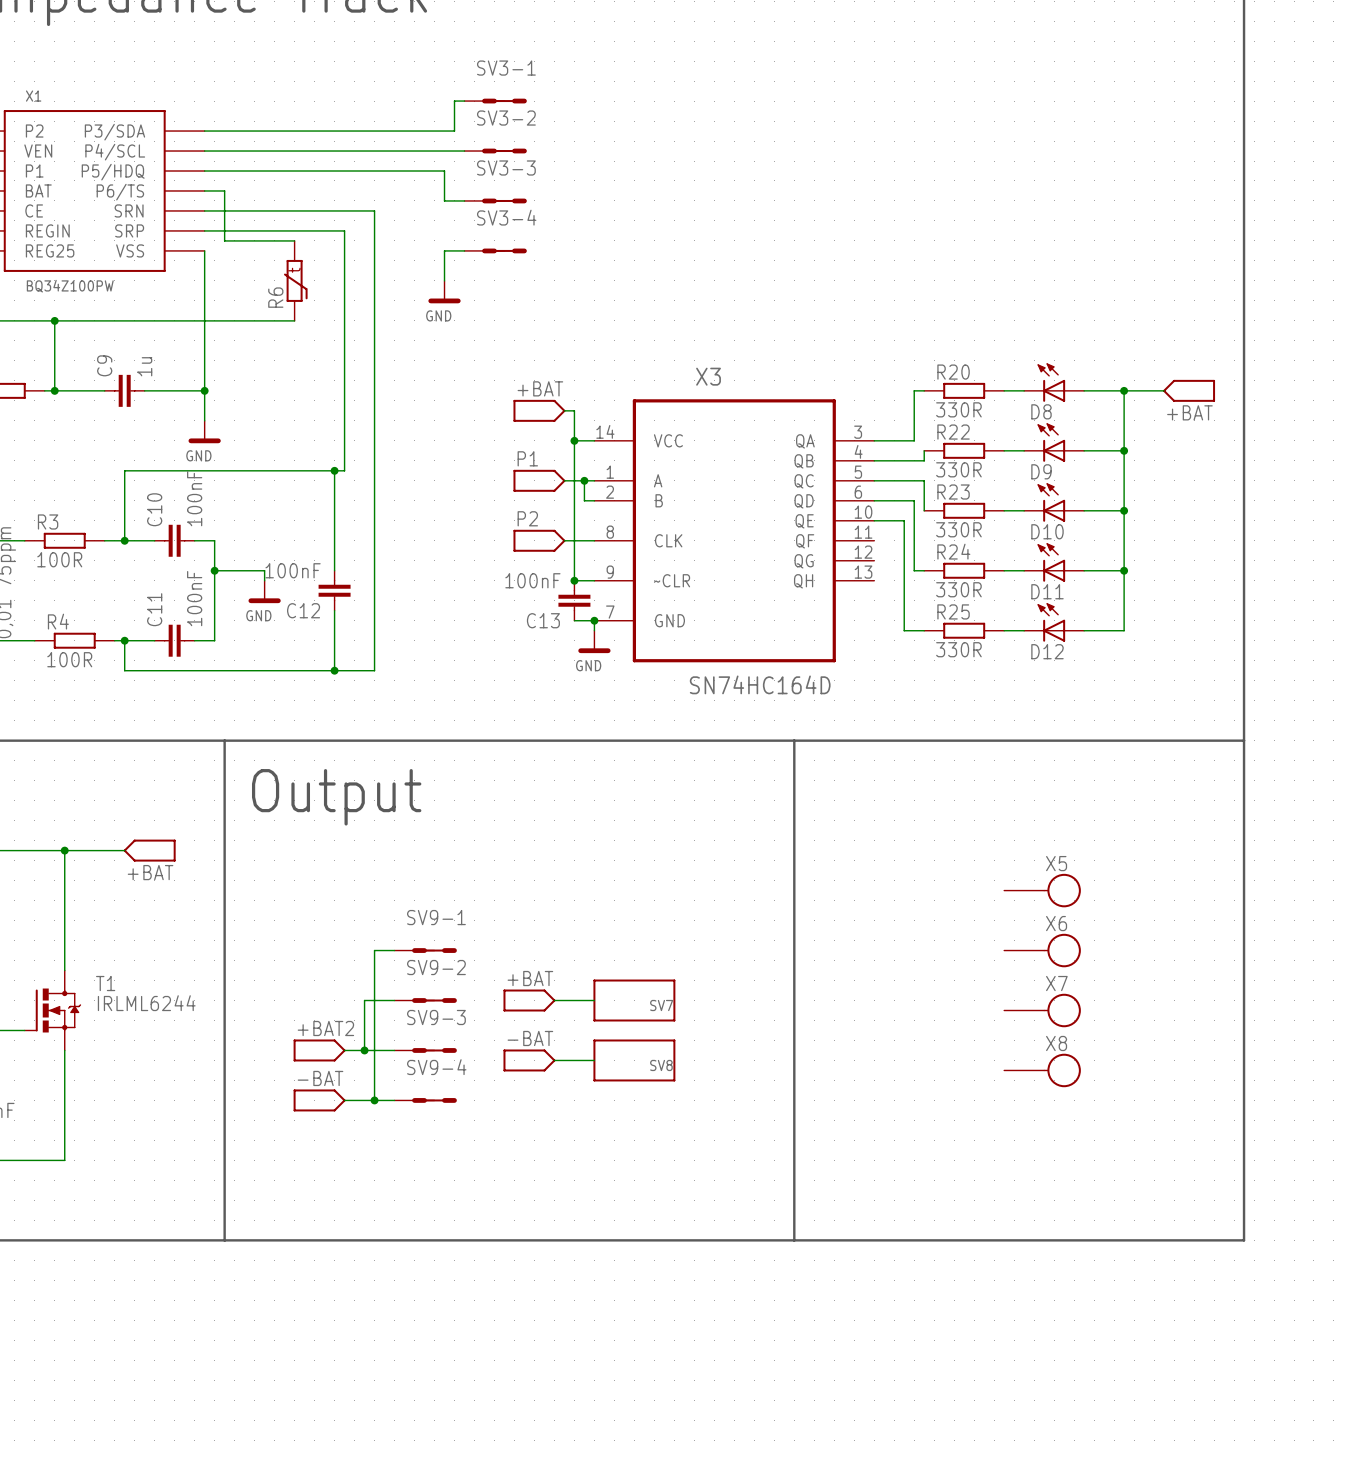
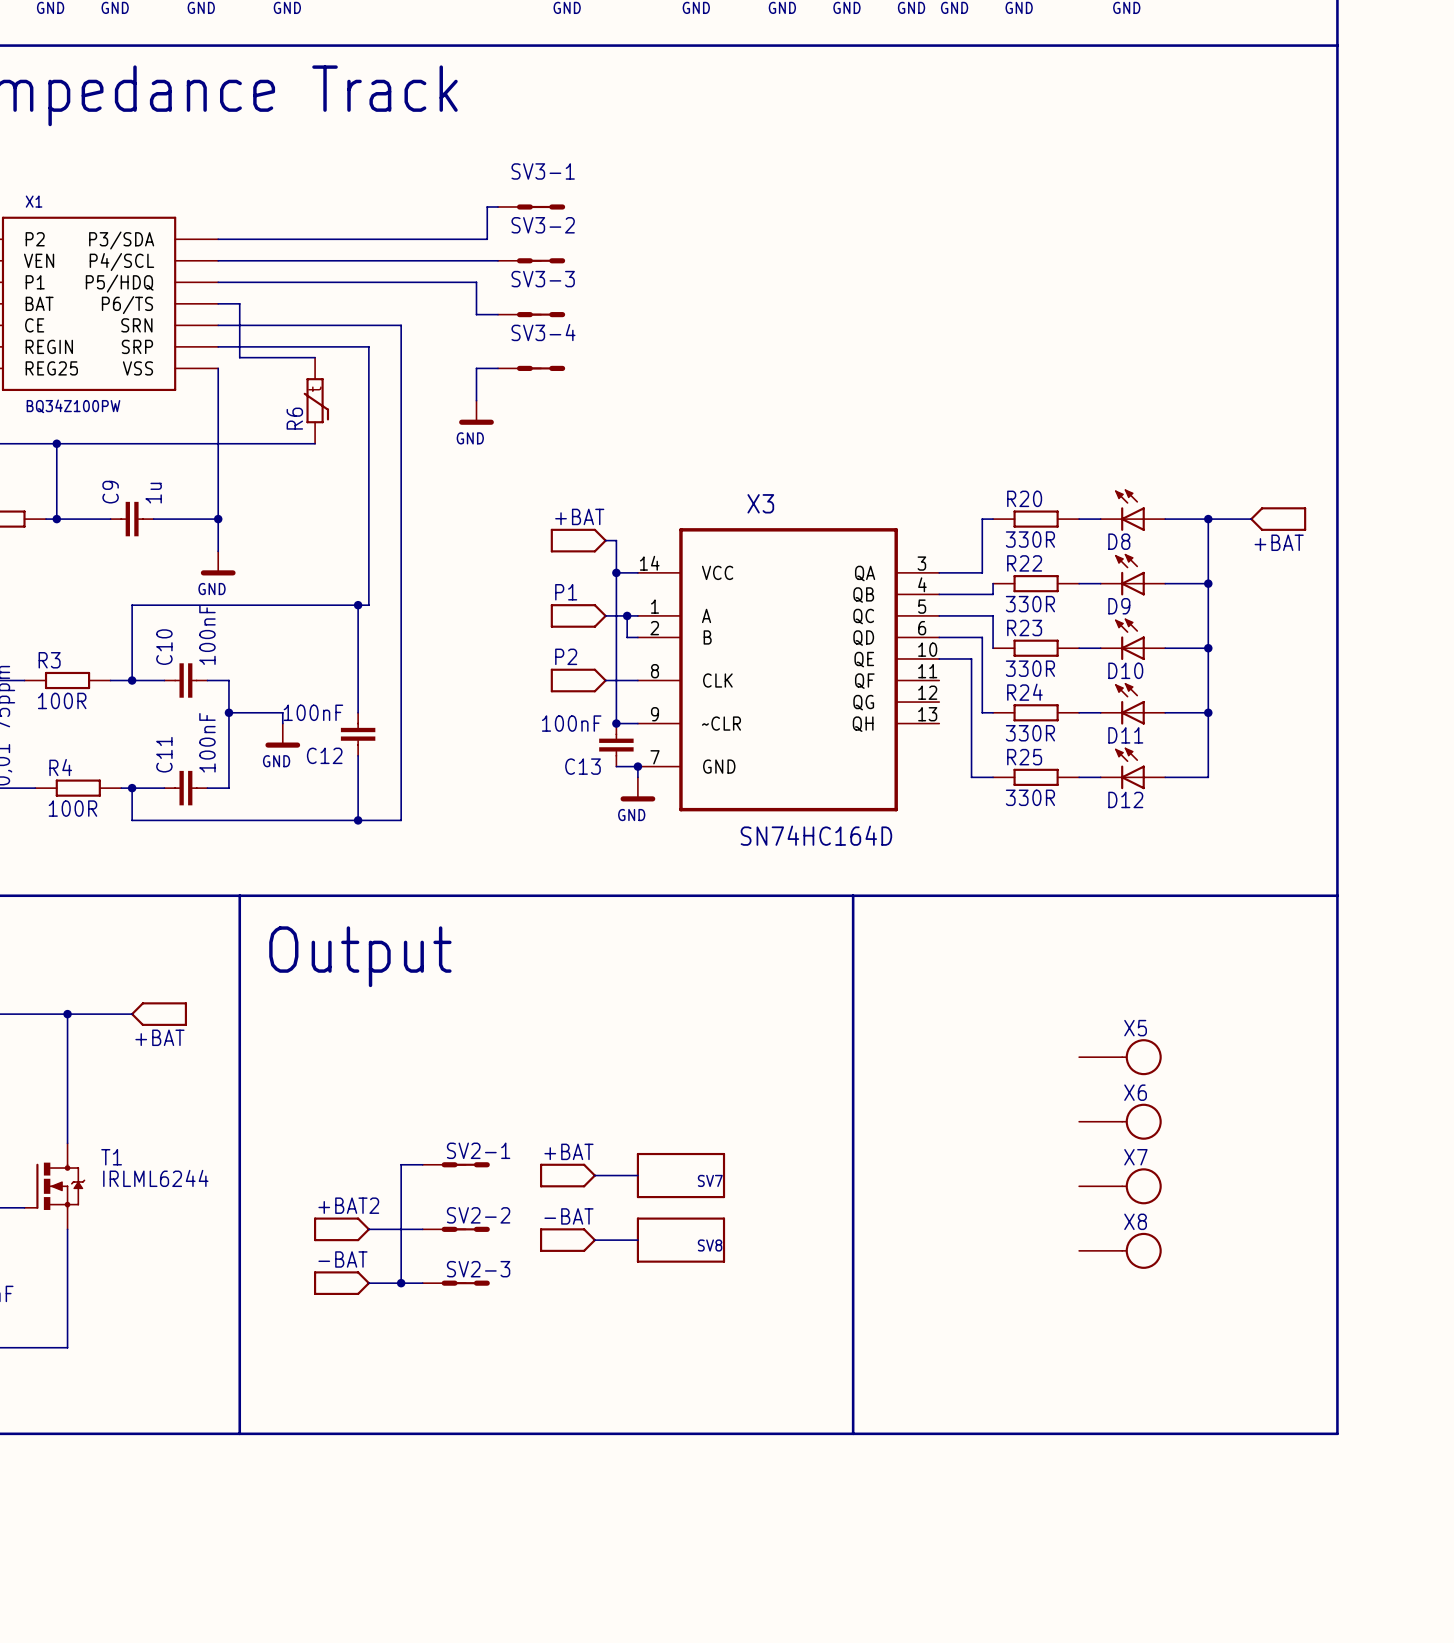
wire: (394, 950) (374, 950) (374, 990) -> (422, 1164) (401, 1164)
SV9-1: (425, 950) -> none
SV2-1: none -> (456, 1164)
wire: (394, 1000) (364, 1000) (364, 1050) -> none
SV9-2: (425, 1000) -> none
SV9-3 name: SV9-3 (436, 1017) -> SV2-2 (478, 1215)
junction: (364, 1050) -> none
SV9-4 name: SV9-4 (436, 1067) -> SV2-3 (478, 1269)

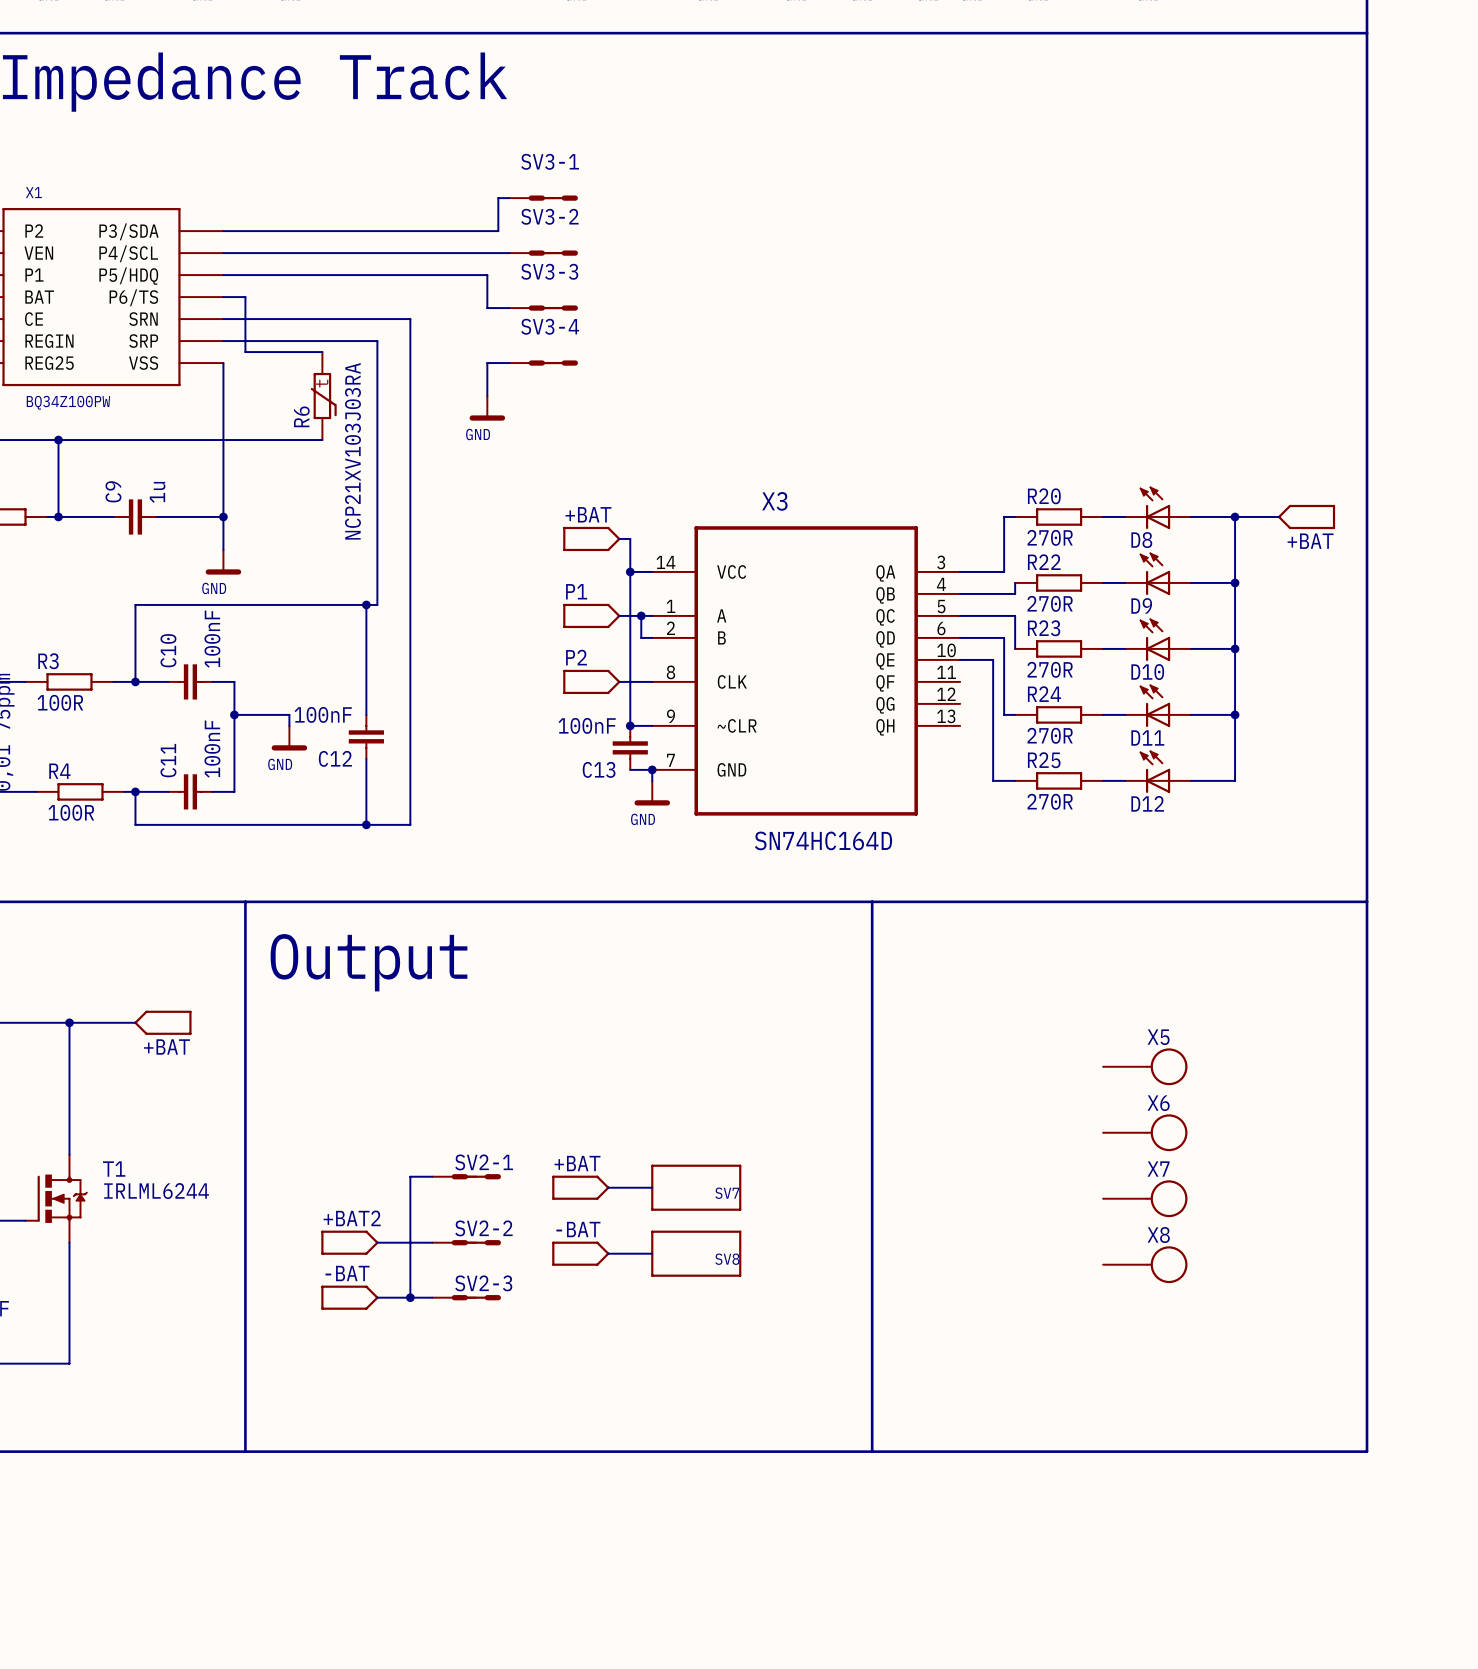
R6 value: none -> NCP21XV103J03RA (352, 451)
R20 value: 330R (1030, 539) -> 270R (1050, 537)
R22 value: 330R (1030, 604) -> 270R (1050, 603)
R23 value: 330R (1030, 668) -> 270R (1050, 669)
R24 value: 330R (1030, 733) -> 270R (1050, 735)
R25 value: 330R (1030, 797) -> 270R (1050, 801)

